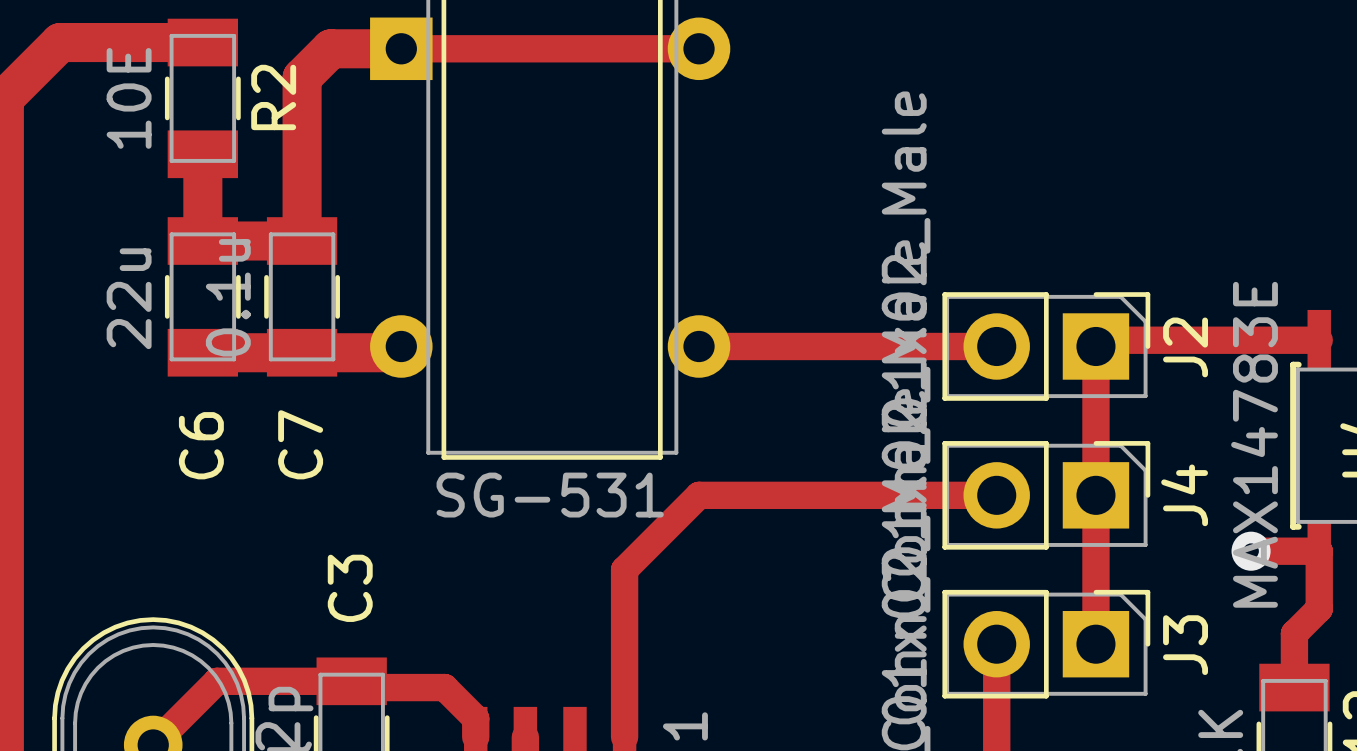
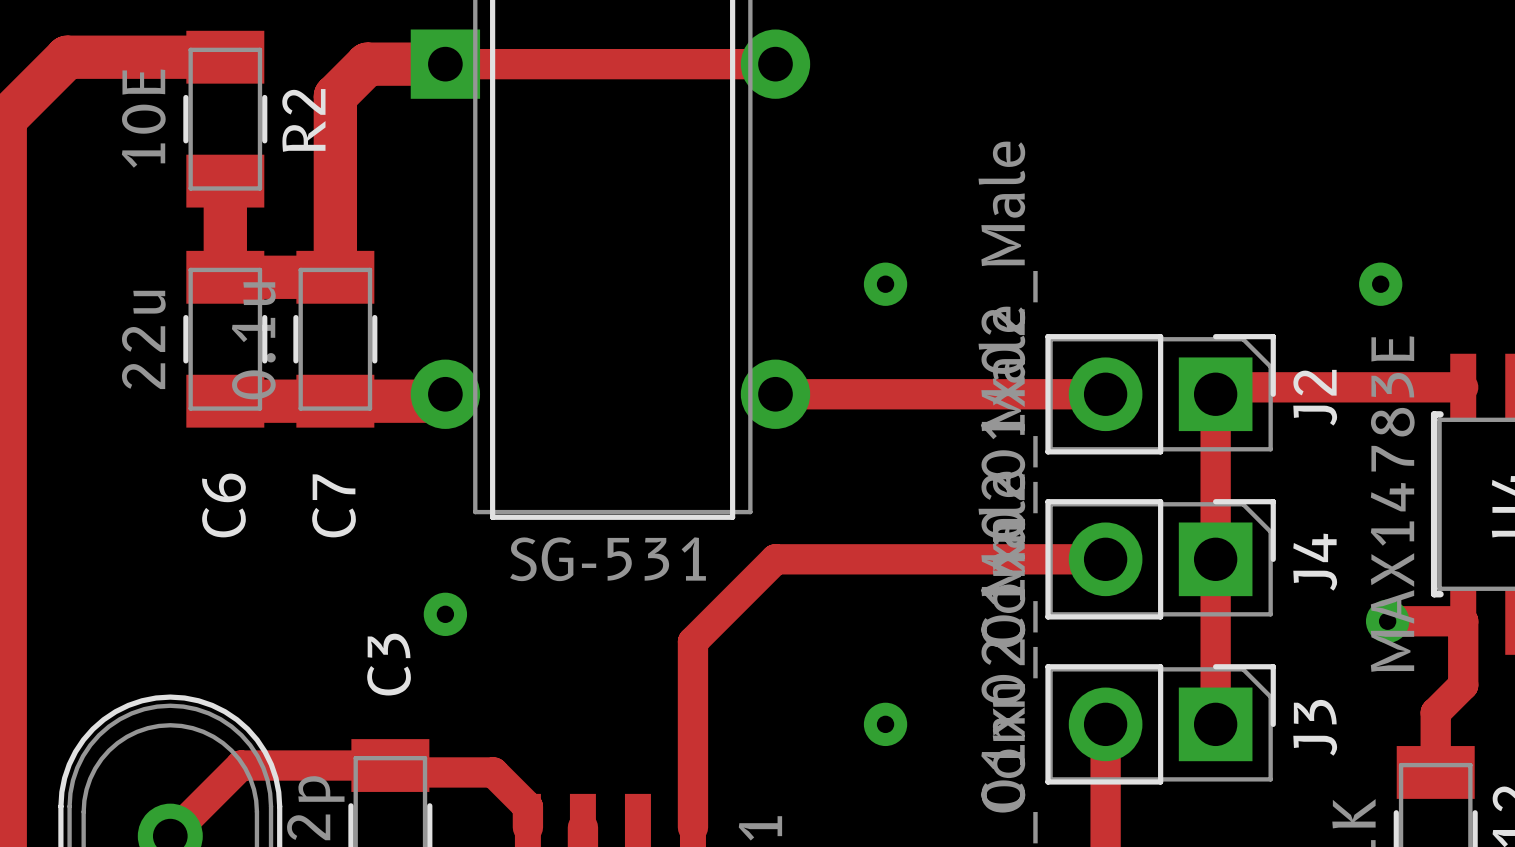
via: none -> (885, 284)
via: none -> (1380, 284)
via: none -> (445, 614)
via: none -> (885, 724)

